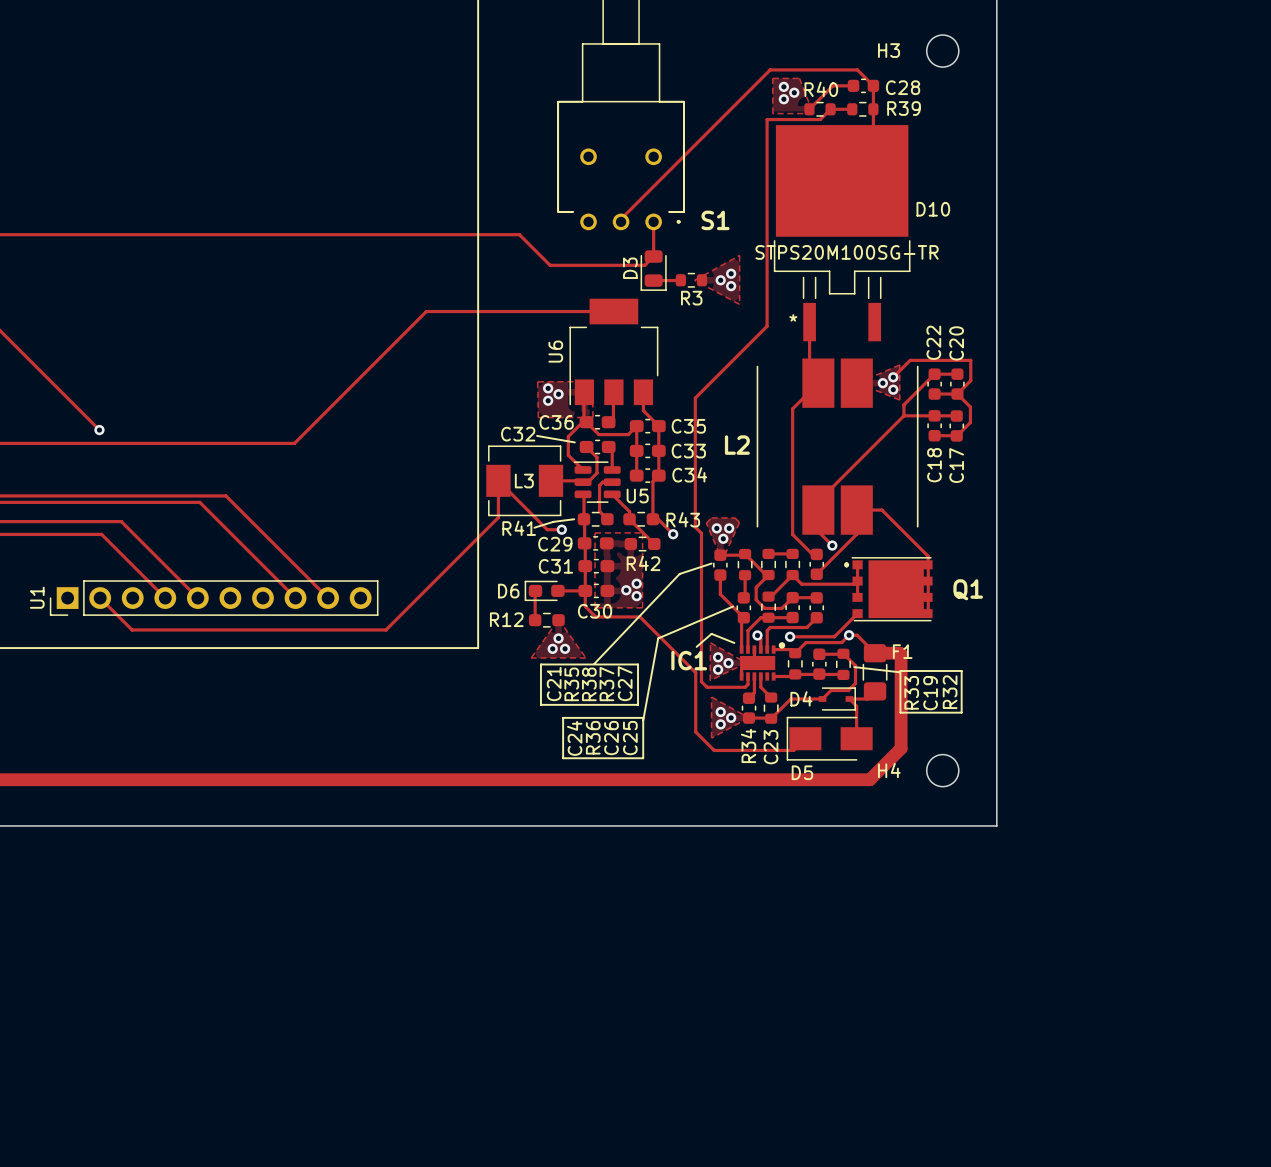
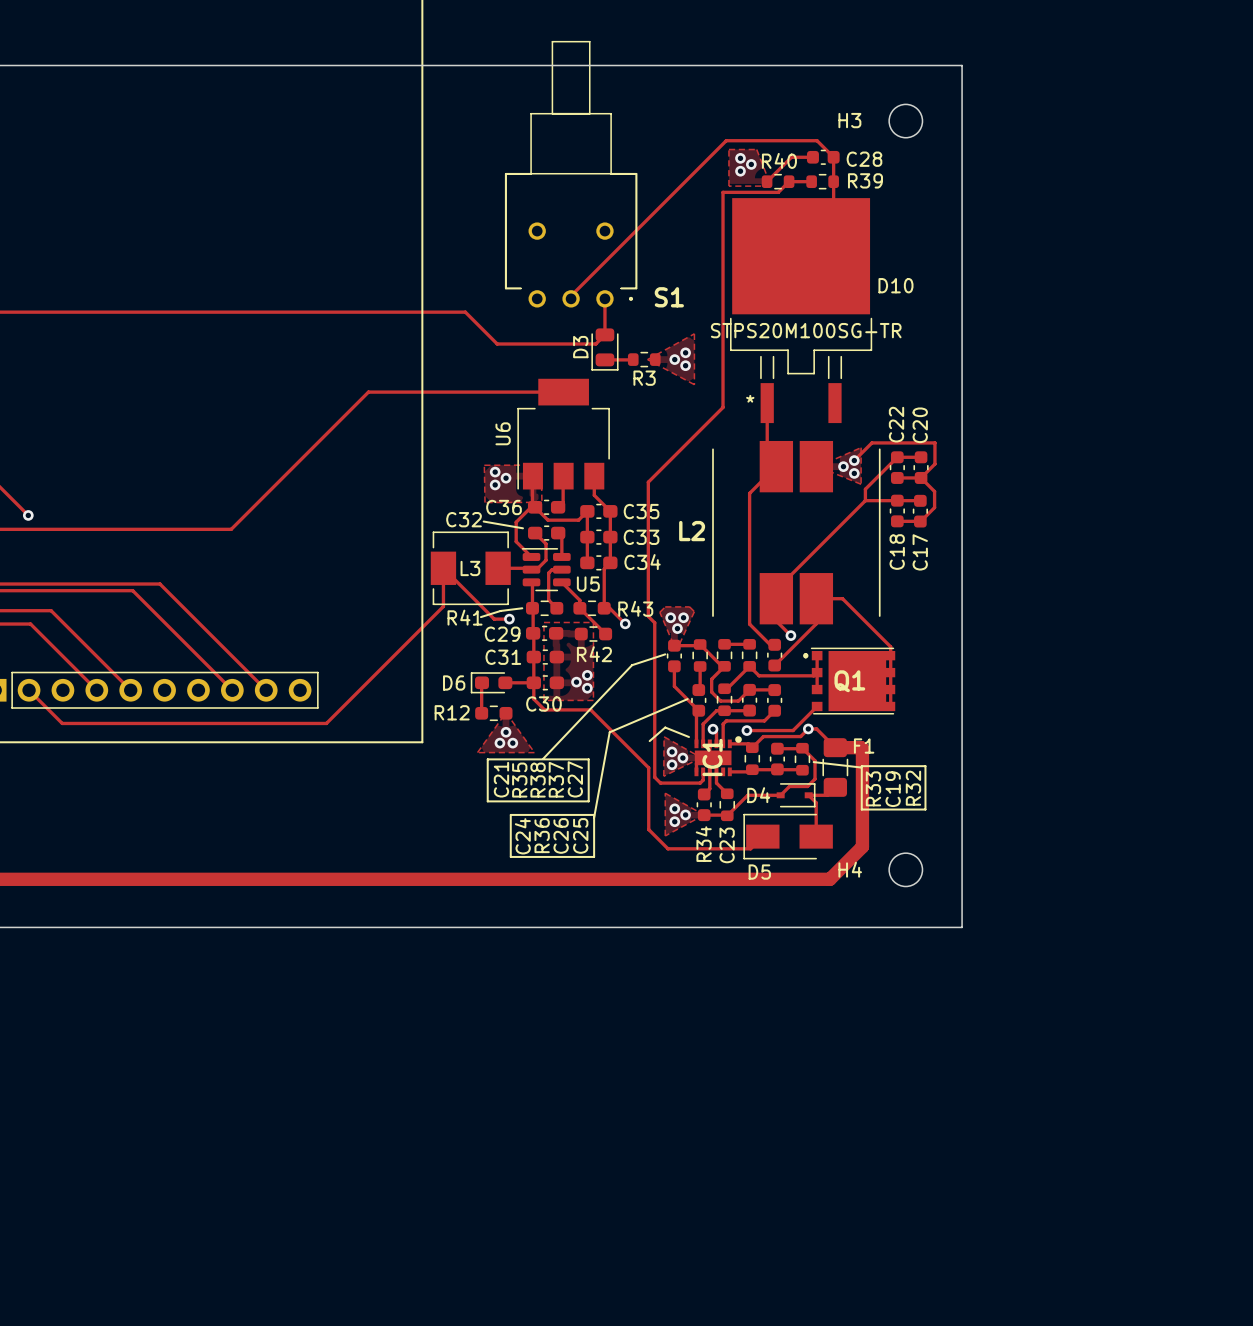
Q1 name position: Q1 (968, 589) -> Q1 (849, 681)
IC1 name rotation: 0° (689, 660) -> 90° counterclockwise (712, 757)
IC1 name position: IC1 (689, 660) -> IC1 (712, 757)

